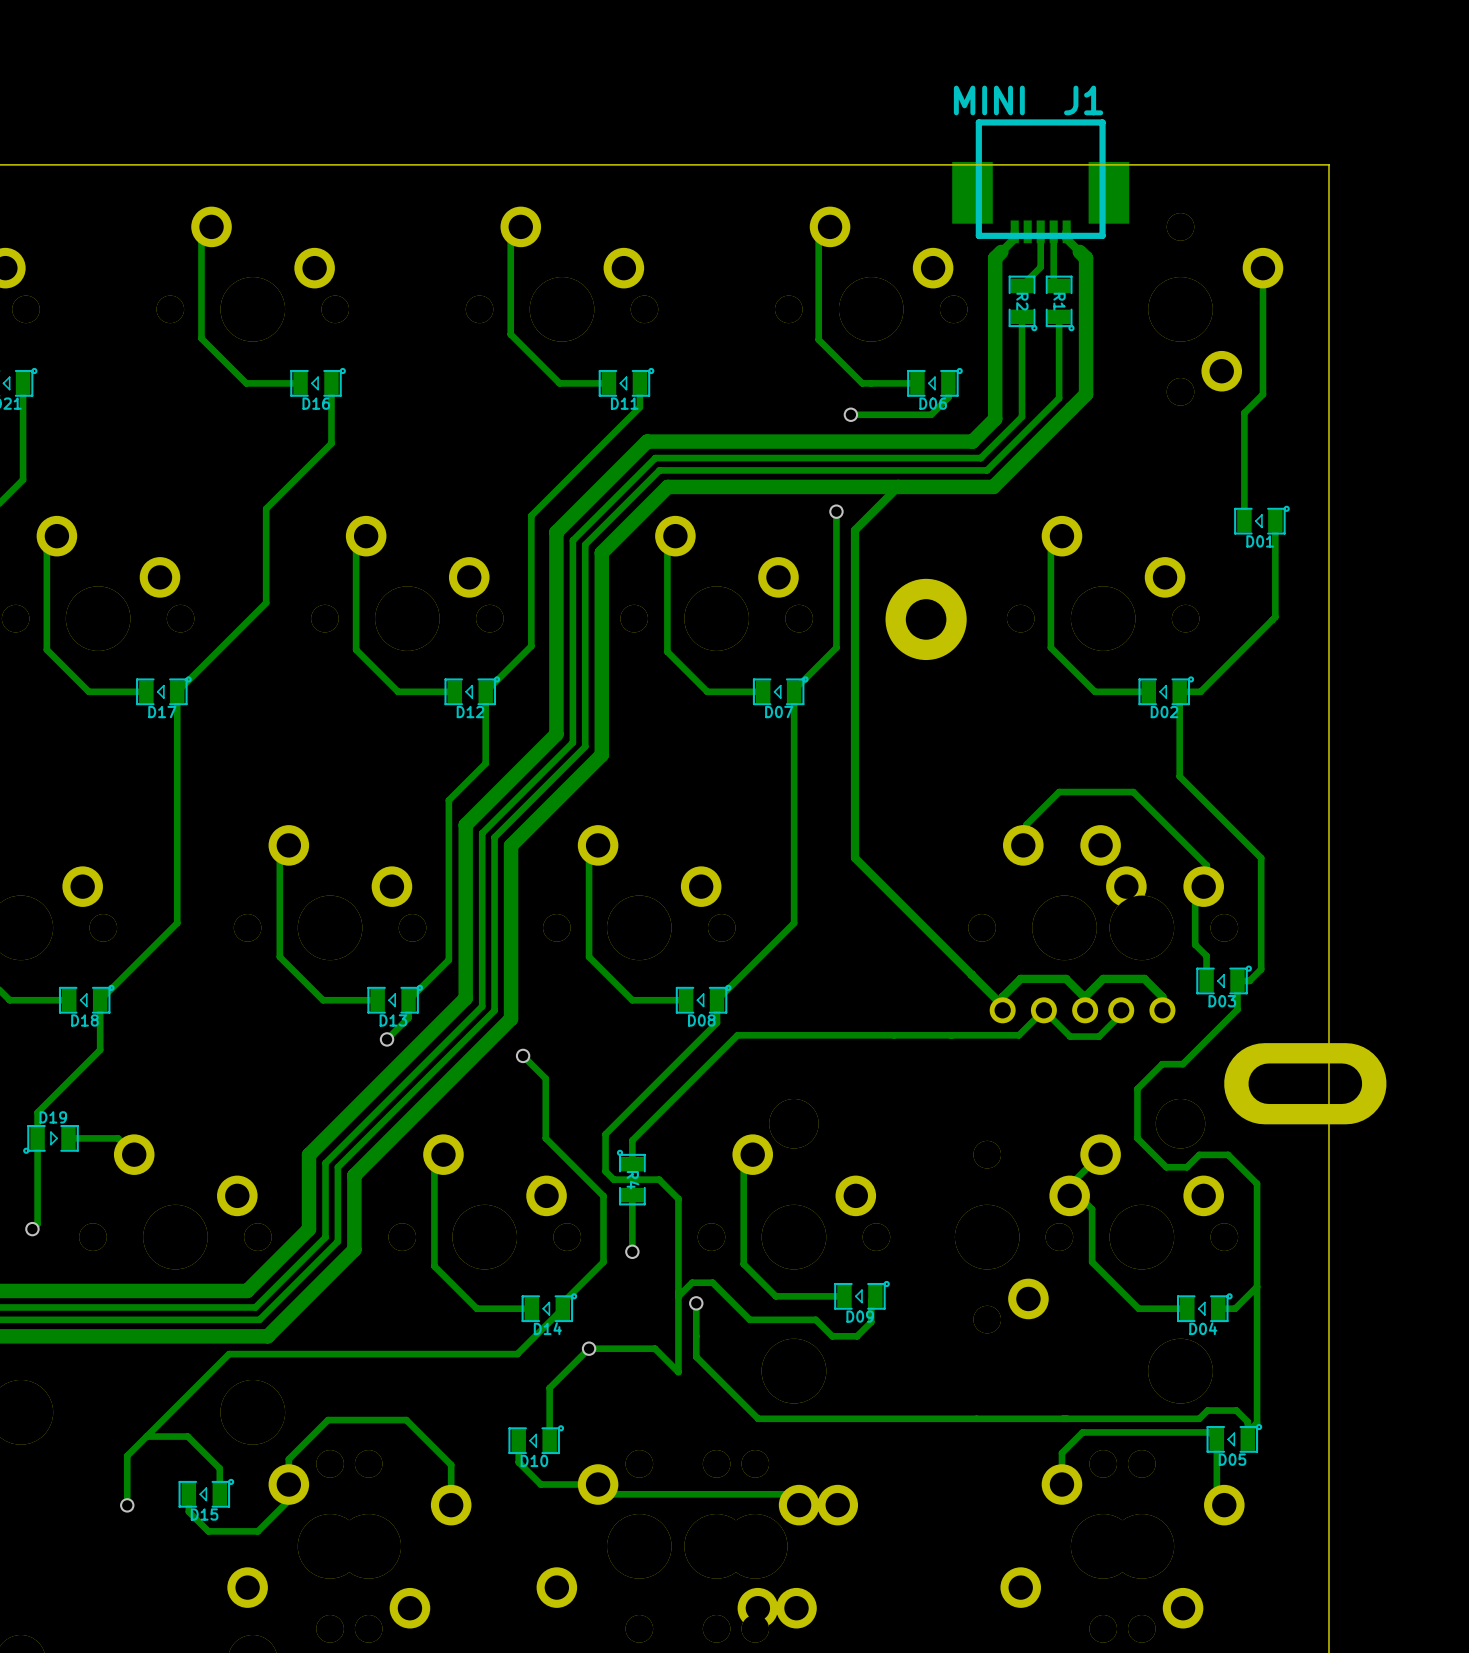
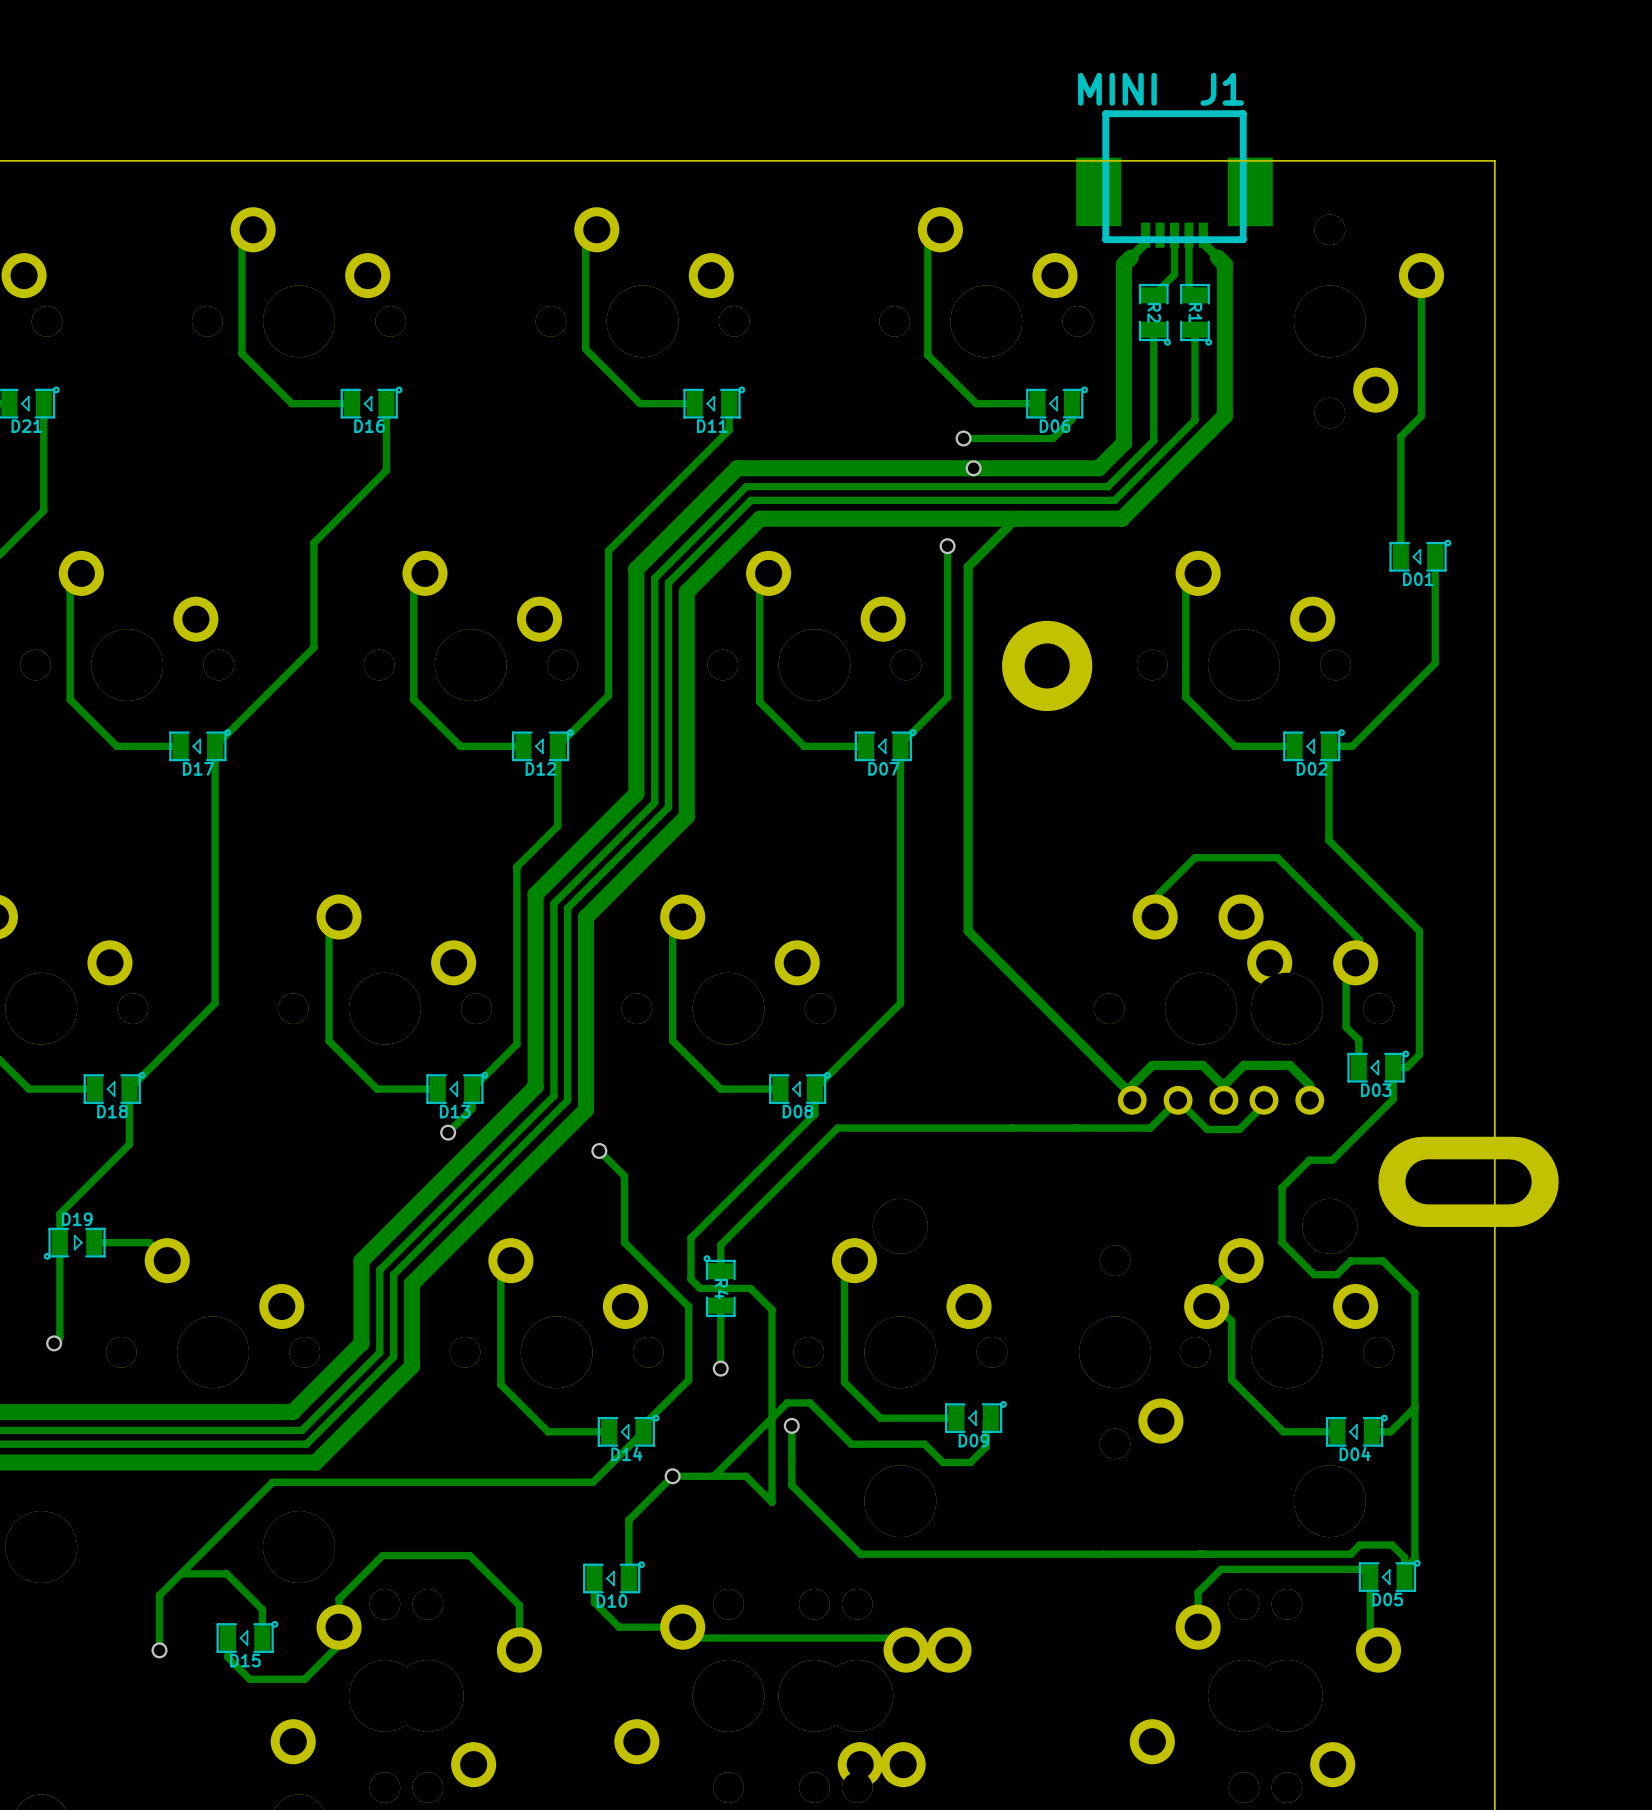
via: none -> (973, 468)
track: (692, 1282) (678, 1296) -> (787, 1402) (713, 1476)

